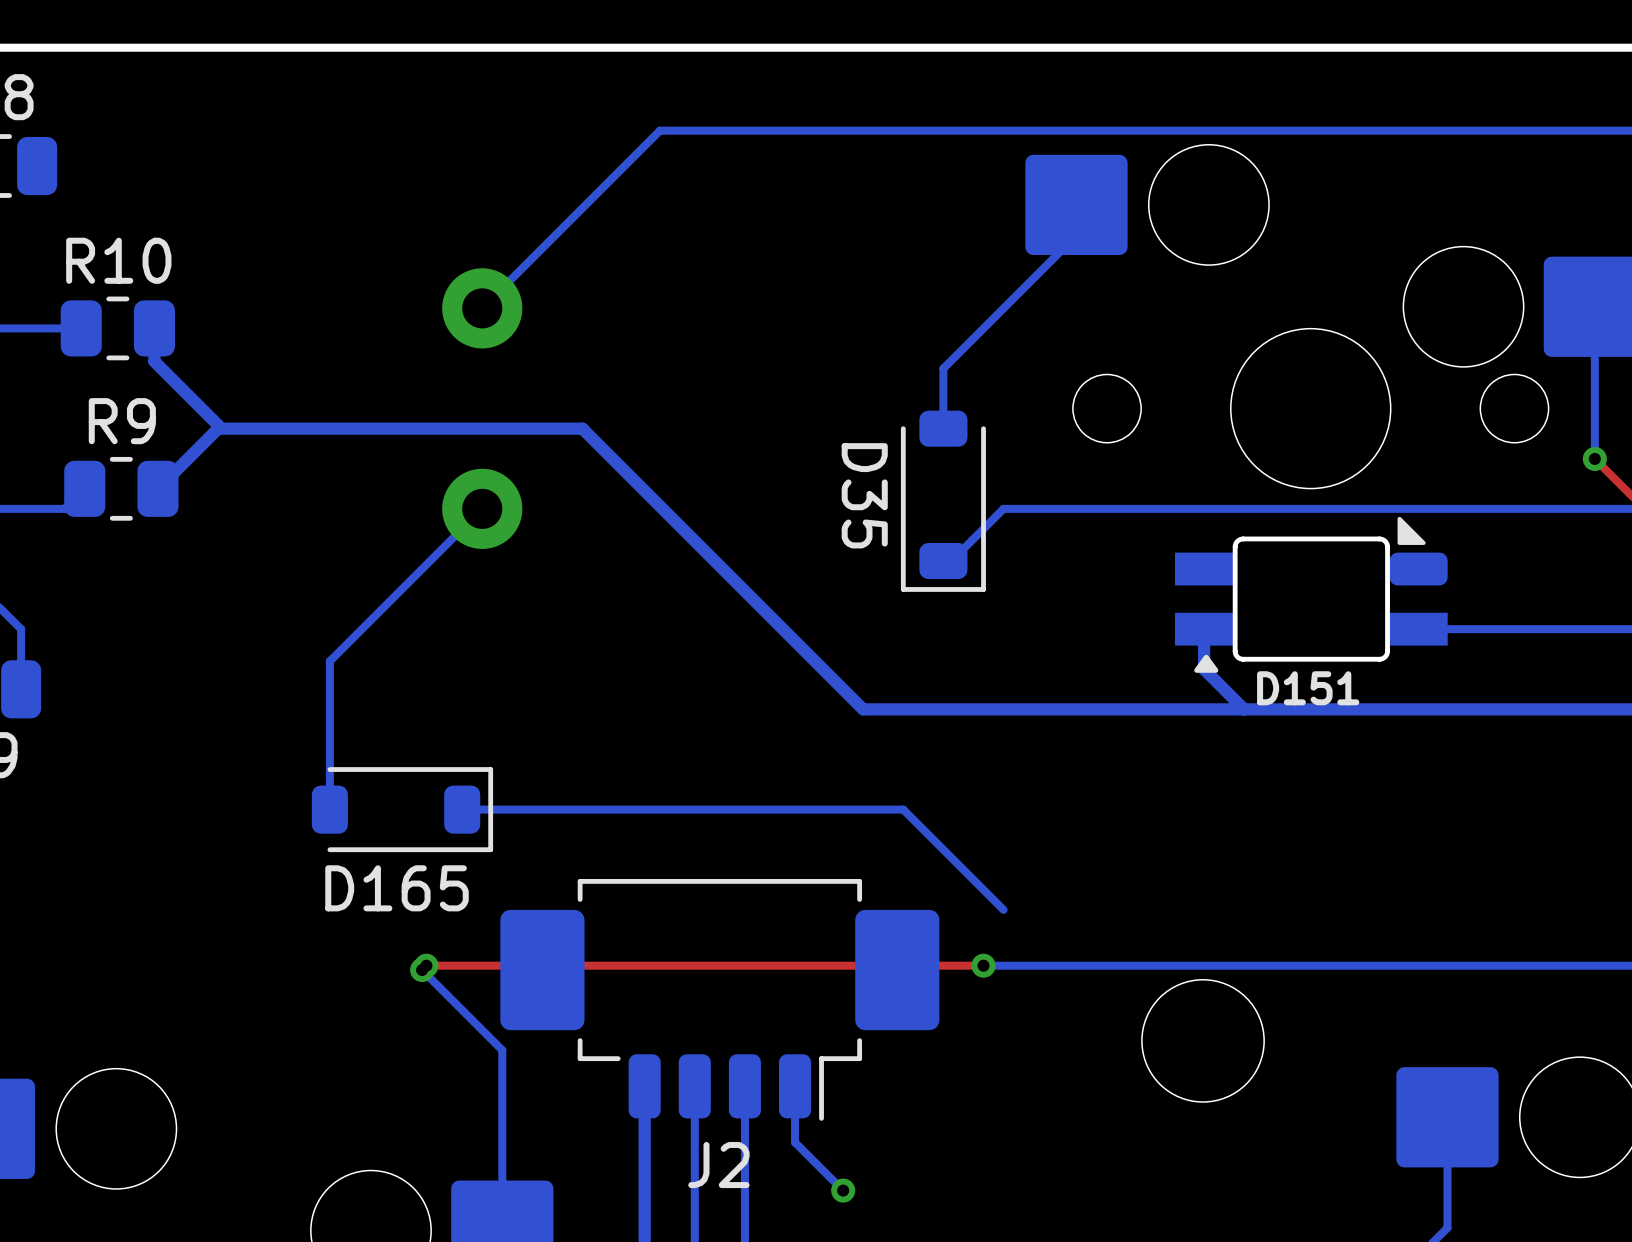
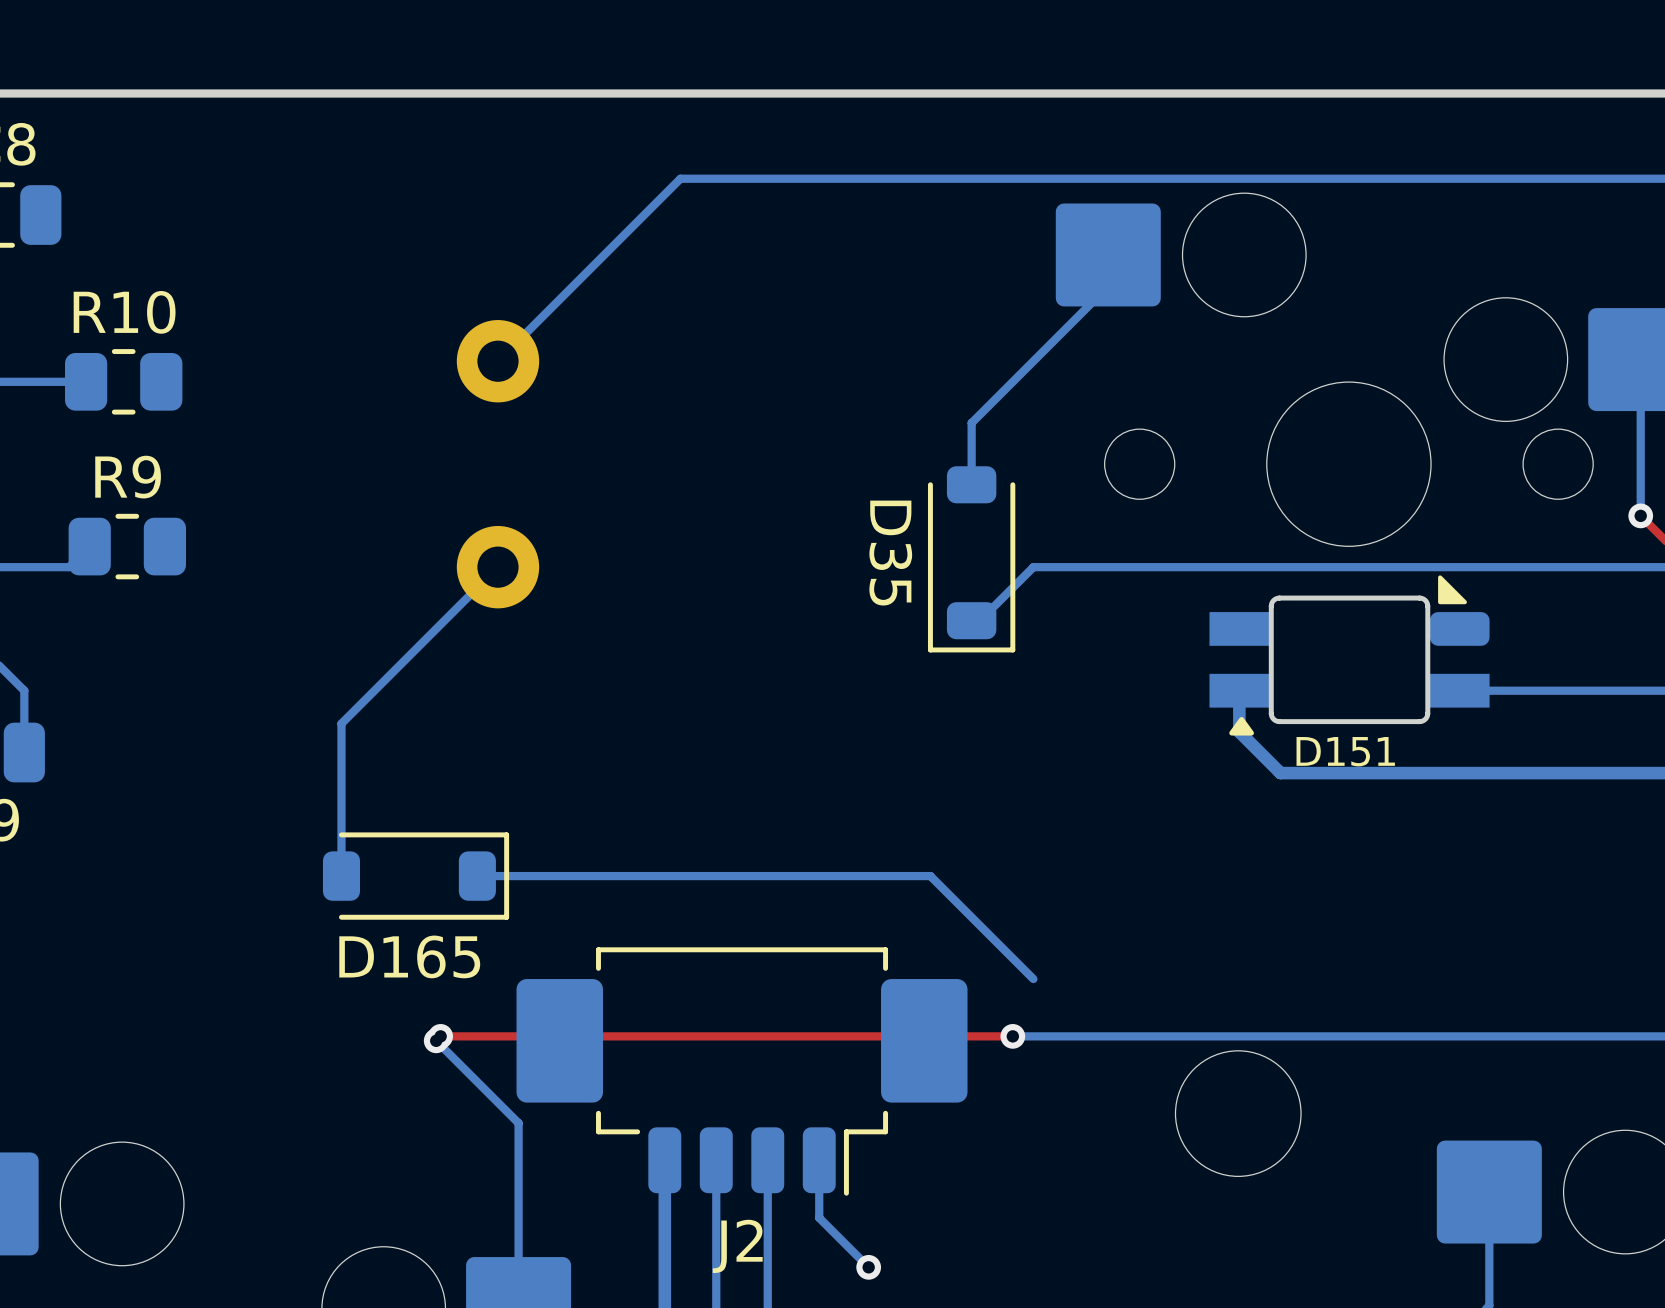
bottom track: (154, 328) (154, 361) (218, 425) (218, 428) -> none
bottom track: (218, 428) (157, 488) -> none
bottom track: (218, 428) (582, 428) (863, 709) (1244, 709) -> none

